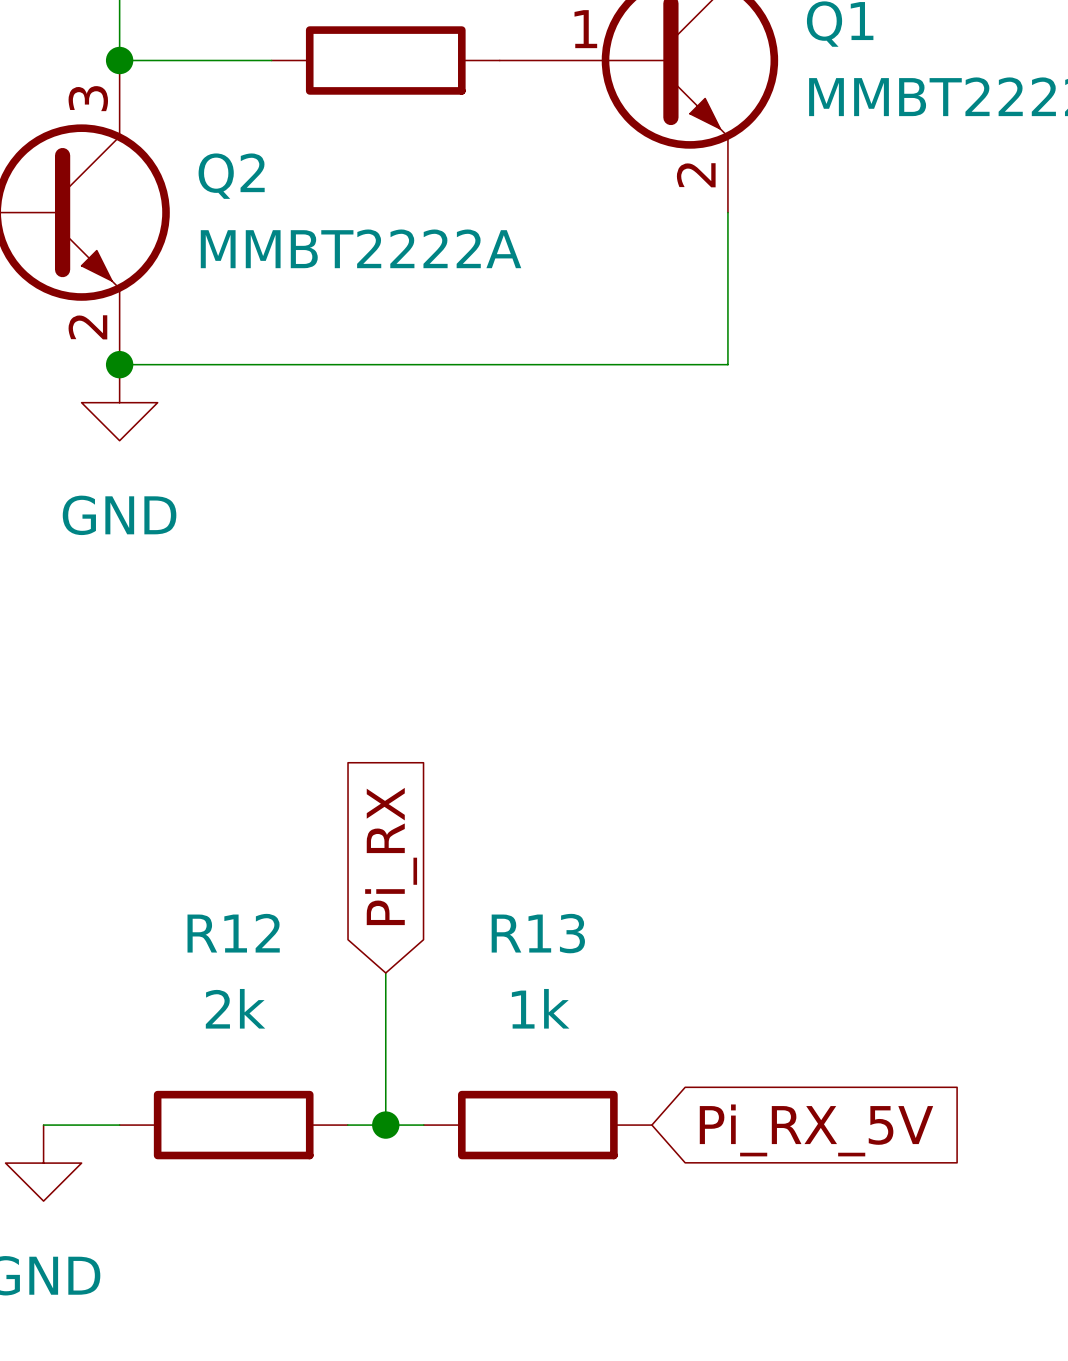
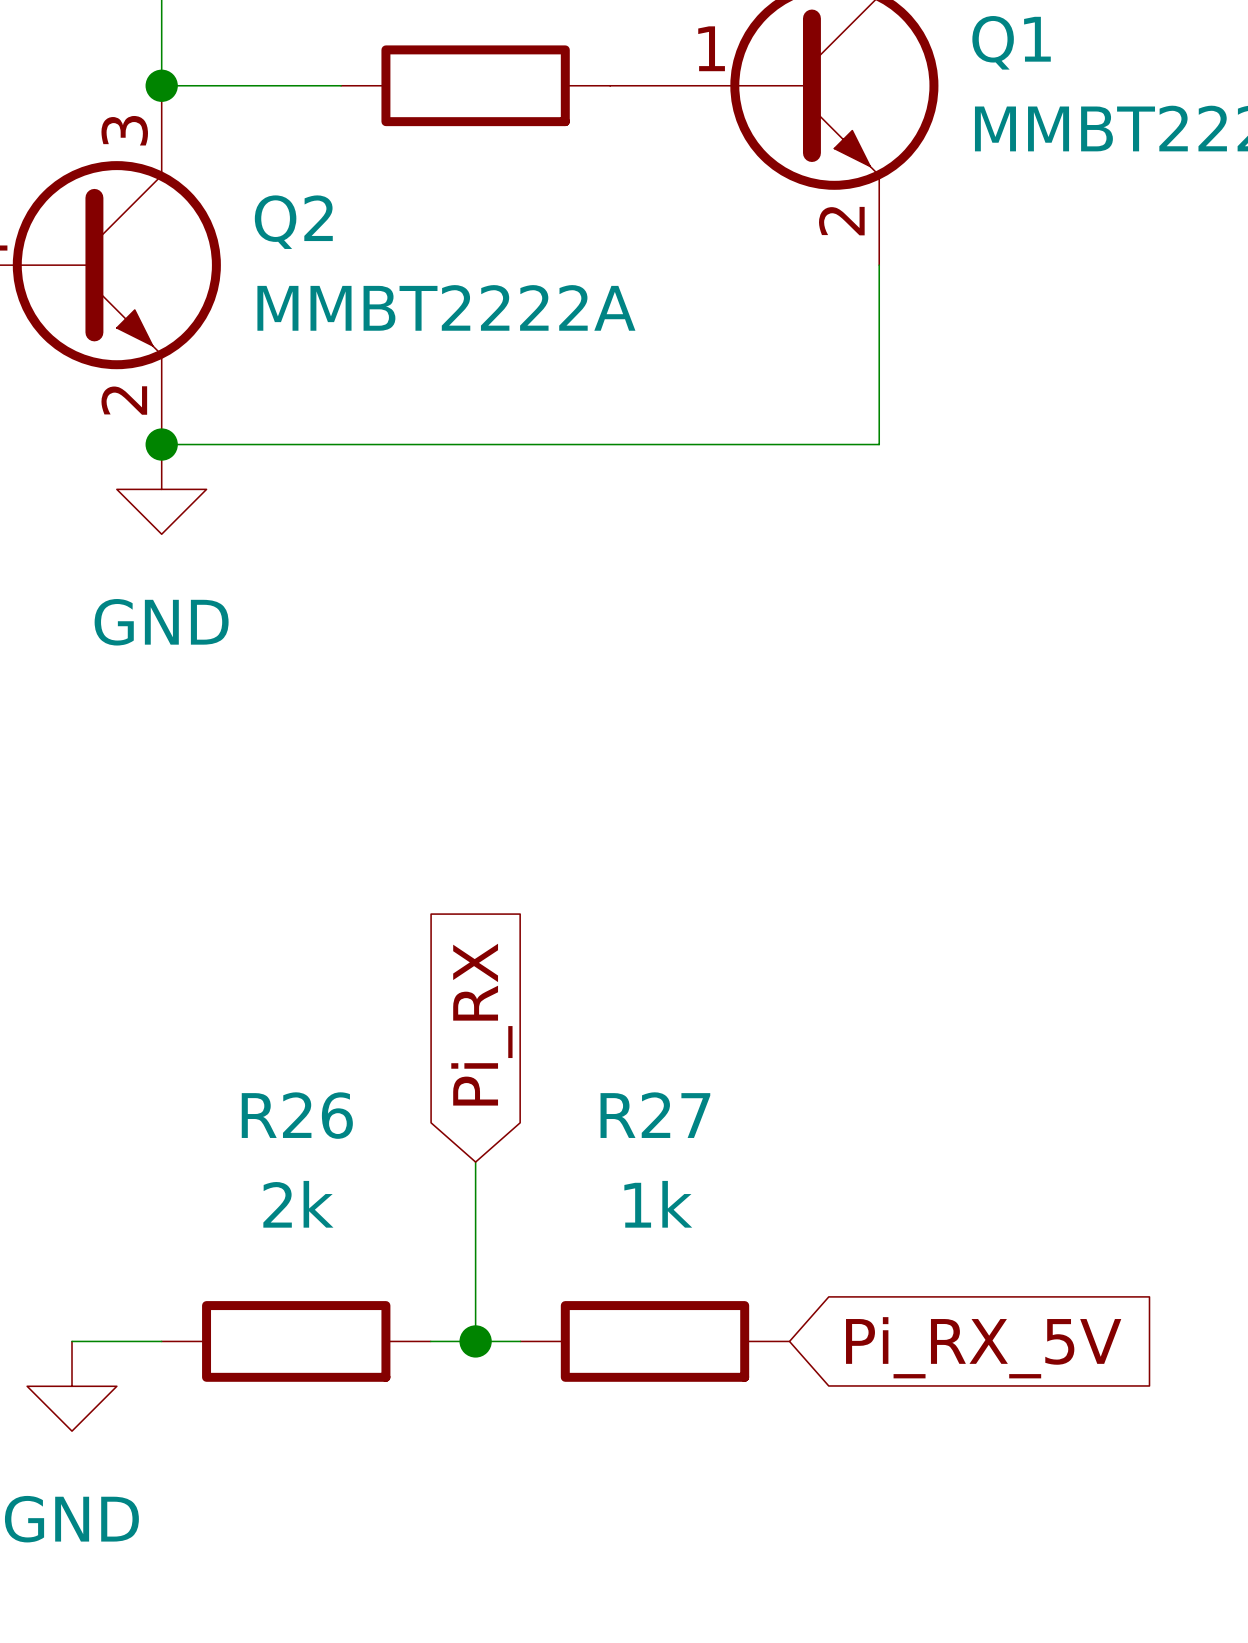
R12 name: R12 (233, 933) -> R26 (297, 1115)
R13 name: R13 (538, 933) -> R27 (655, 1115)

